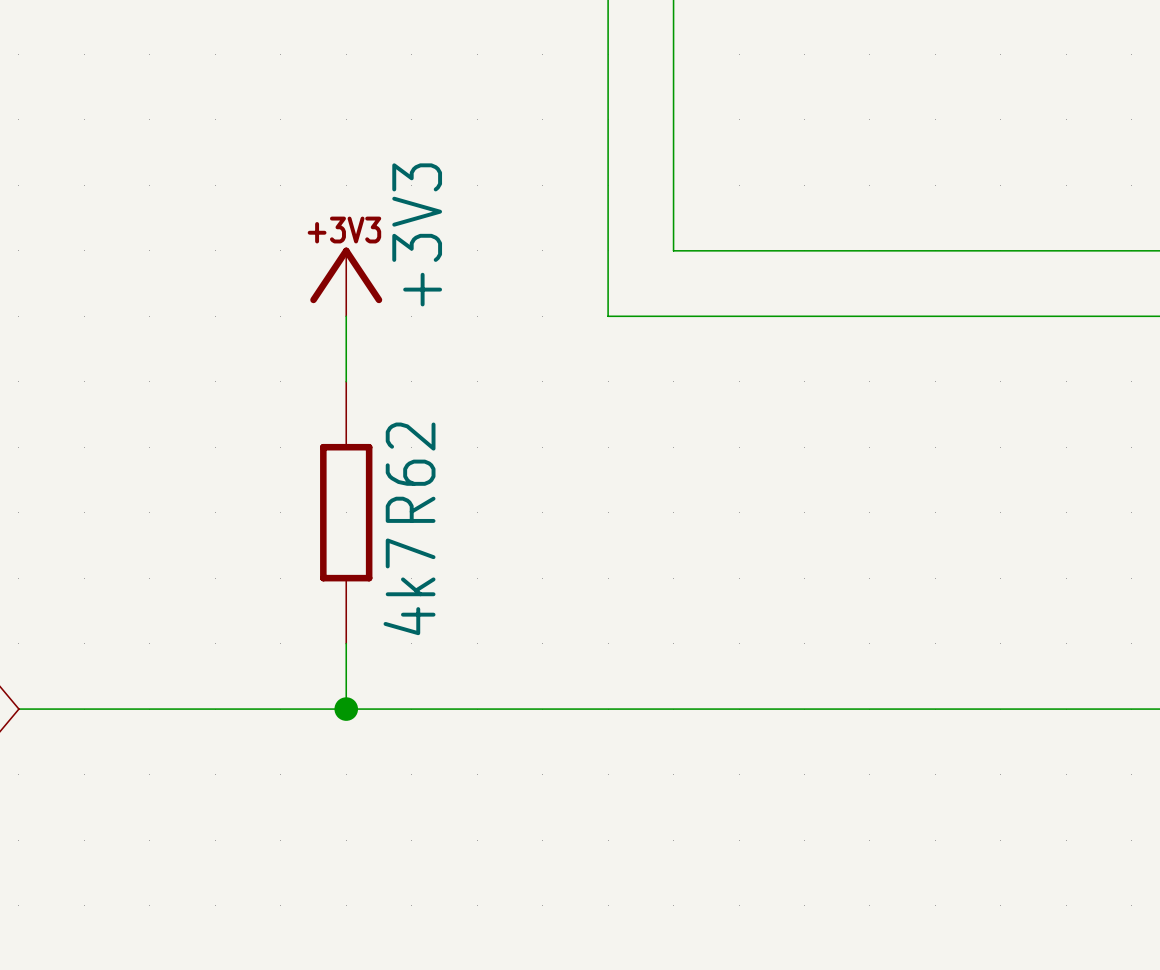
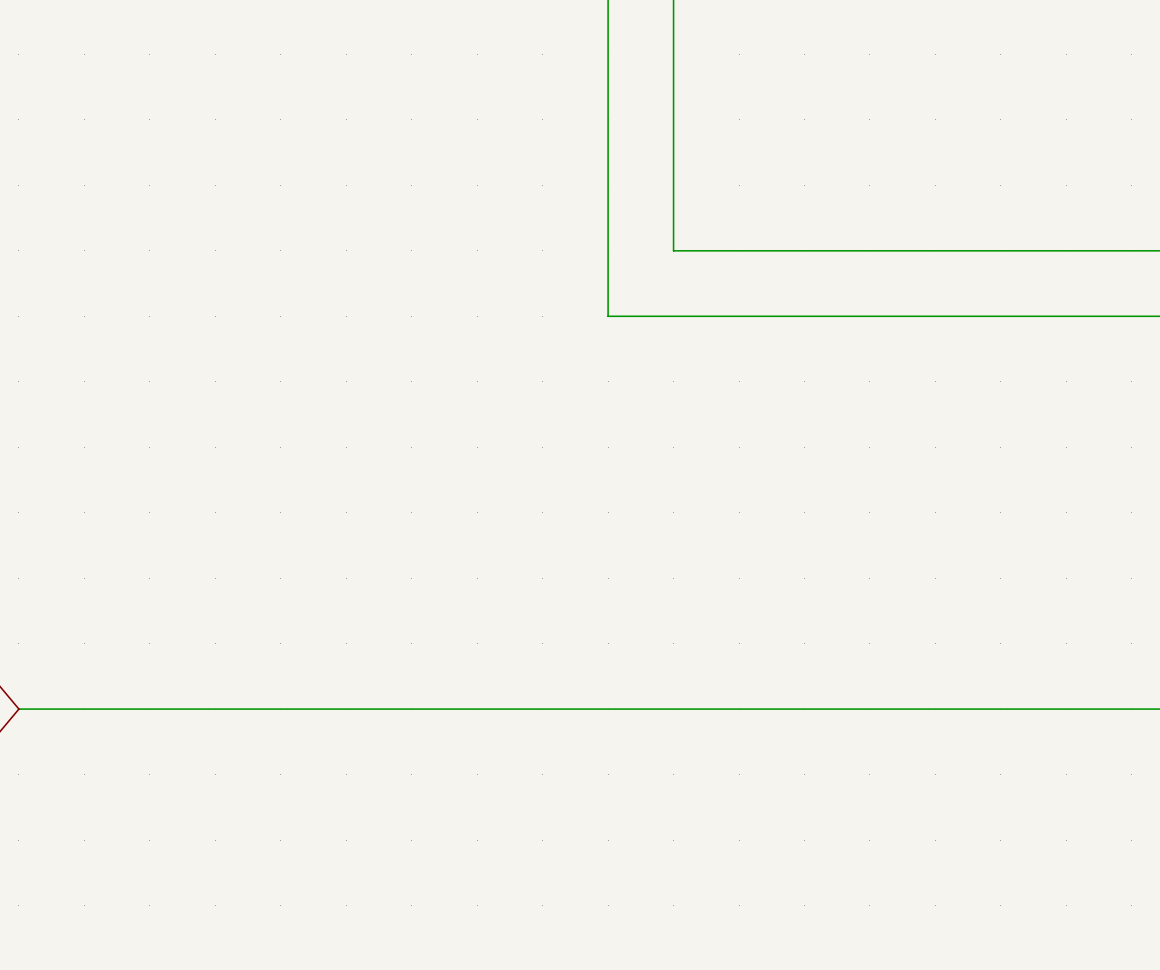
power symbol: +3V3 (346, 281) -> none
wire: (346, 316) (346, 381) -> none
R62: 4k7 (346, 512) -> none
wire: (346, 643) (346, 709) -> none
junction: (346, 709) -> none

